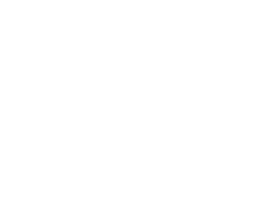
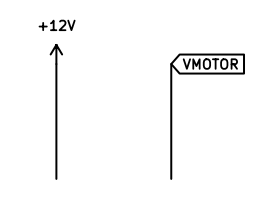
power symbol: none -> +12V (56, 54)
wire: none -> (56, 64) (56, 178)
wire: none -> (171, 64) (171, 178)
global label: none -> VMOTOR (210, 64)

